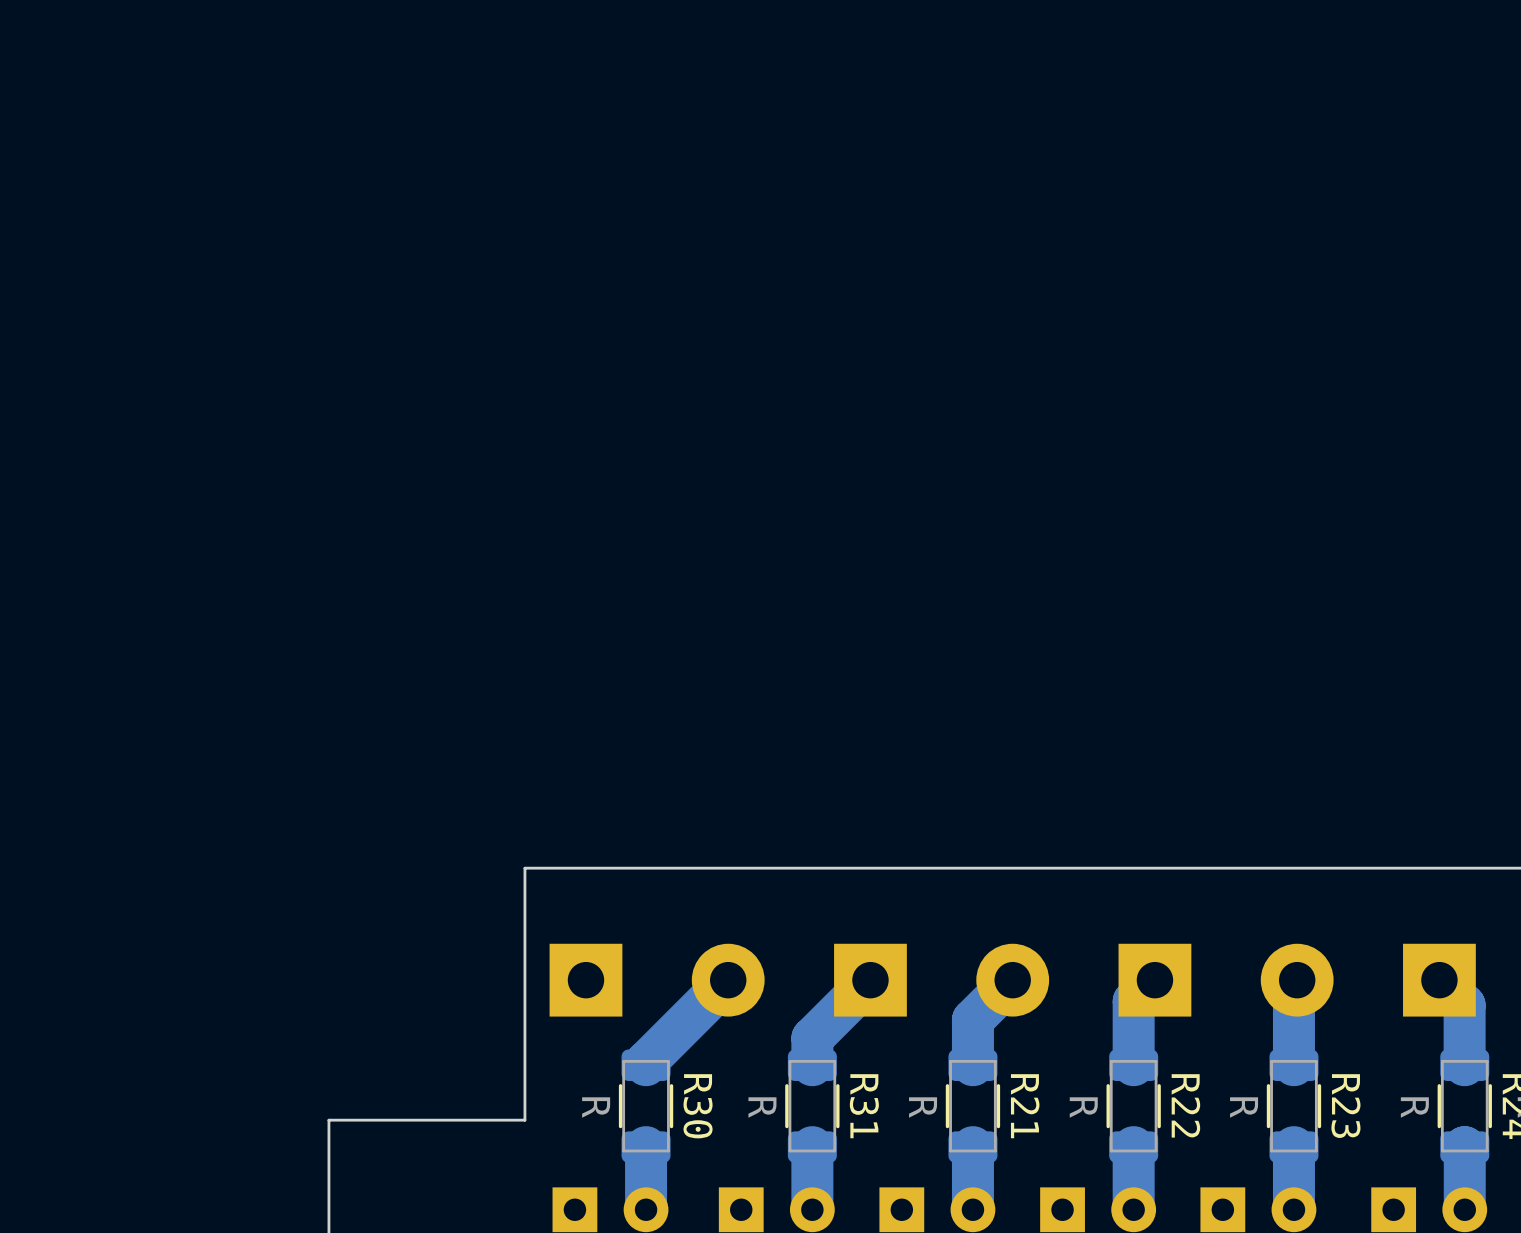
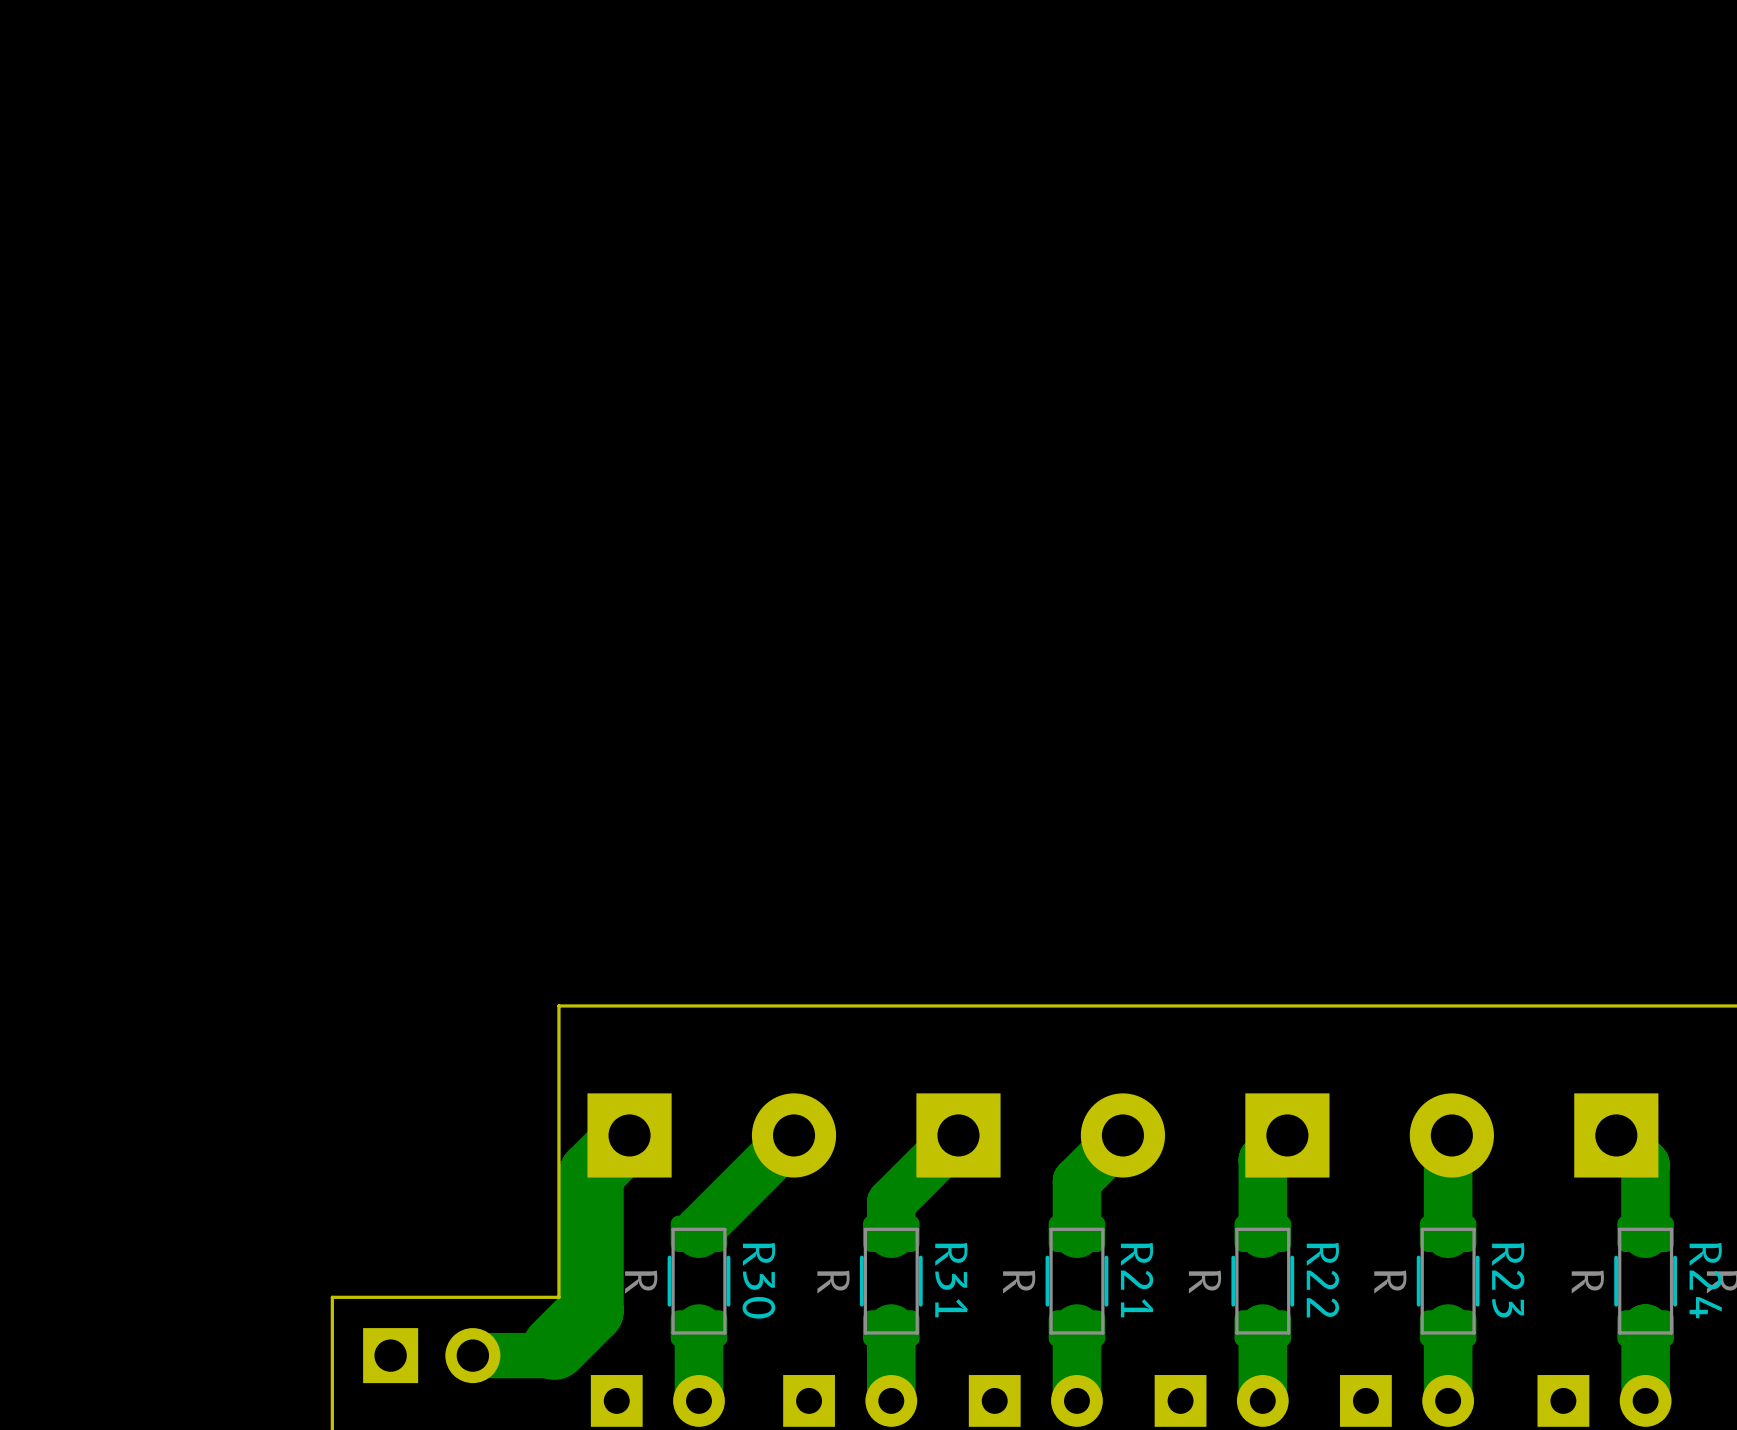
track: none -> (629, 1135) (591, 1173) (591, 1310) (546, 1355) (472, 1355)
part: none -> (431, 1355)

